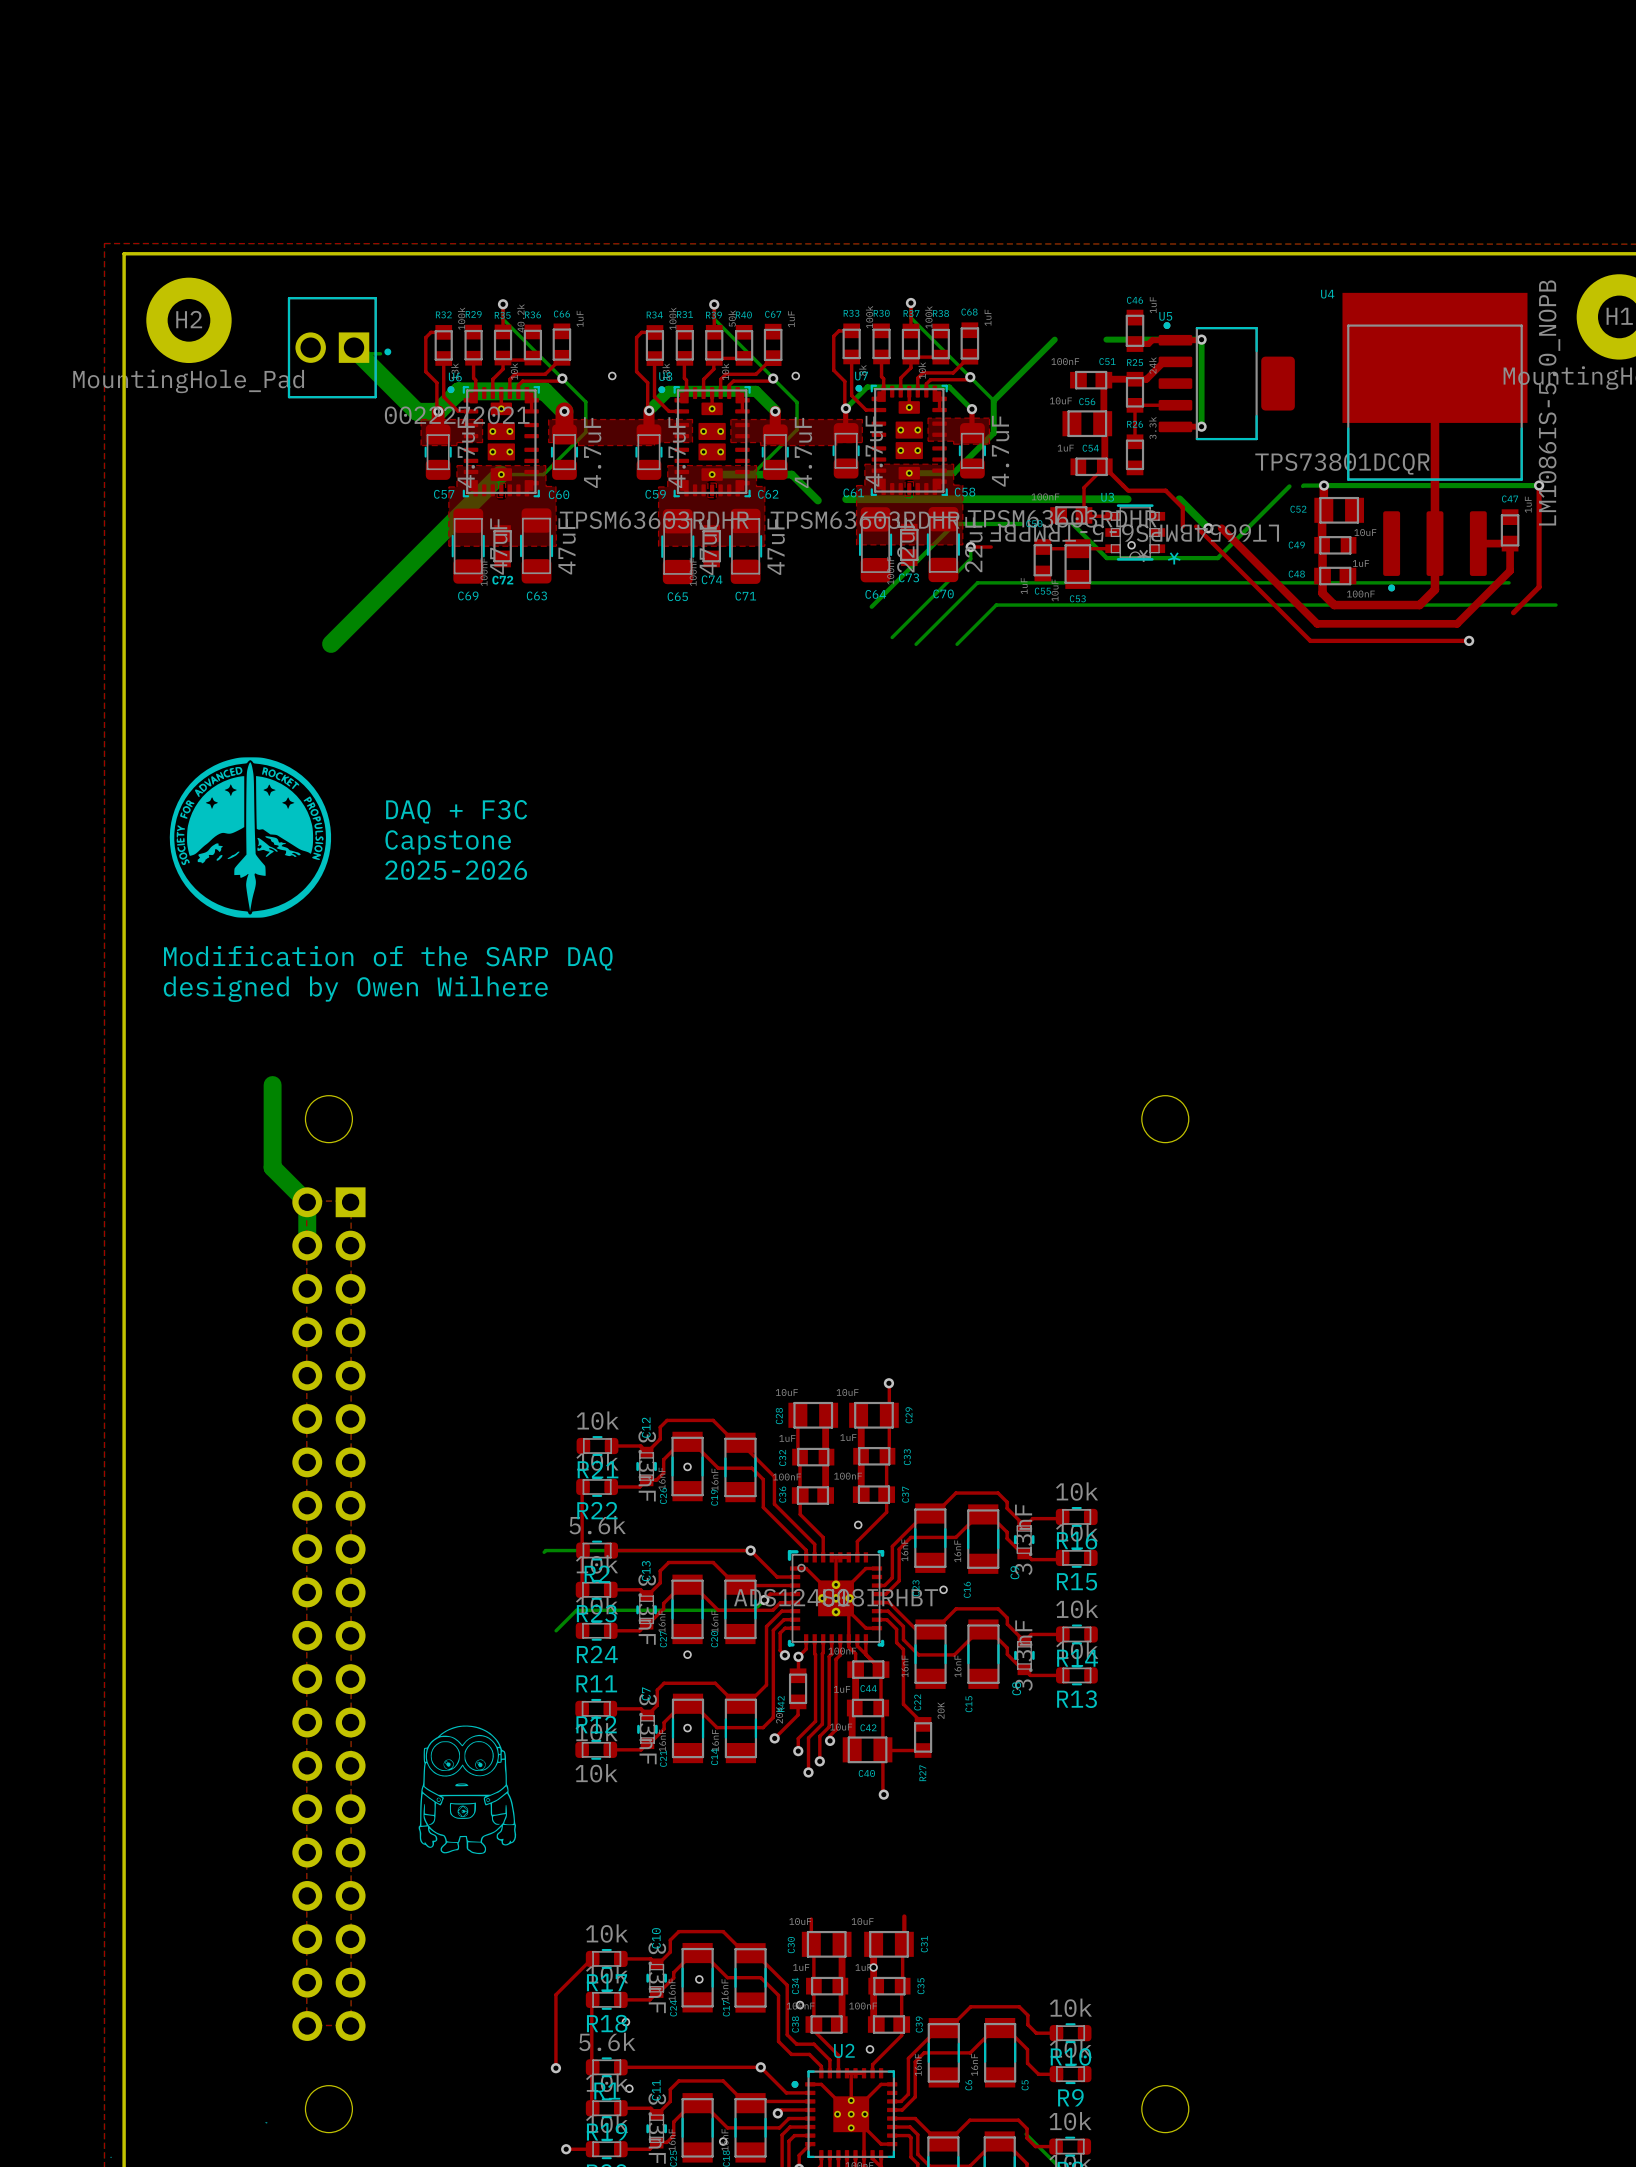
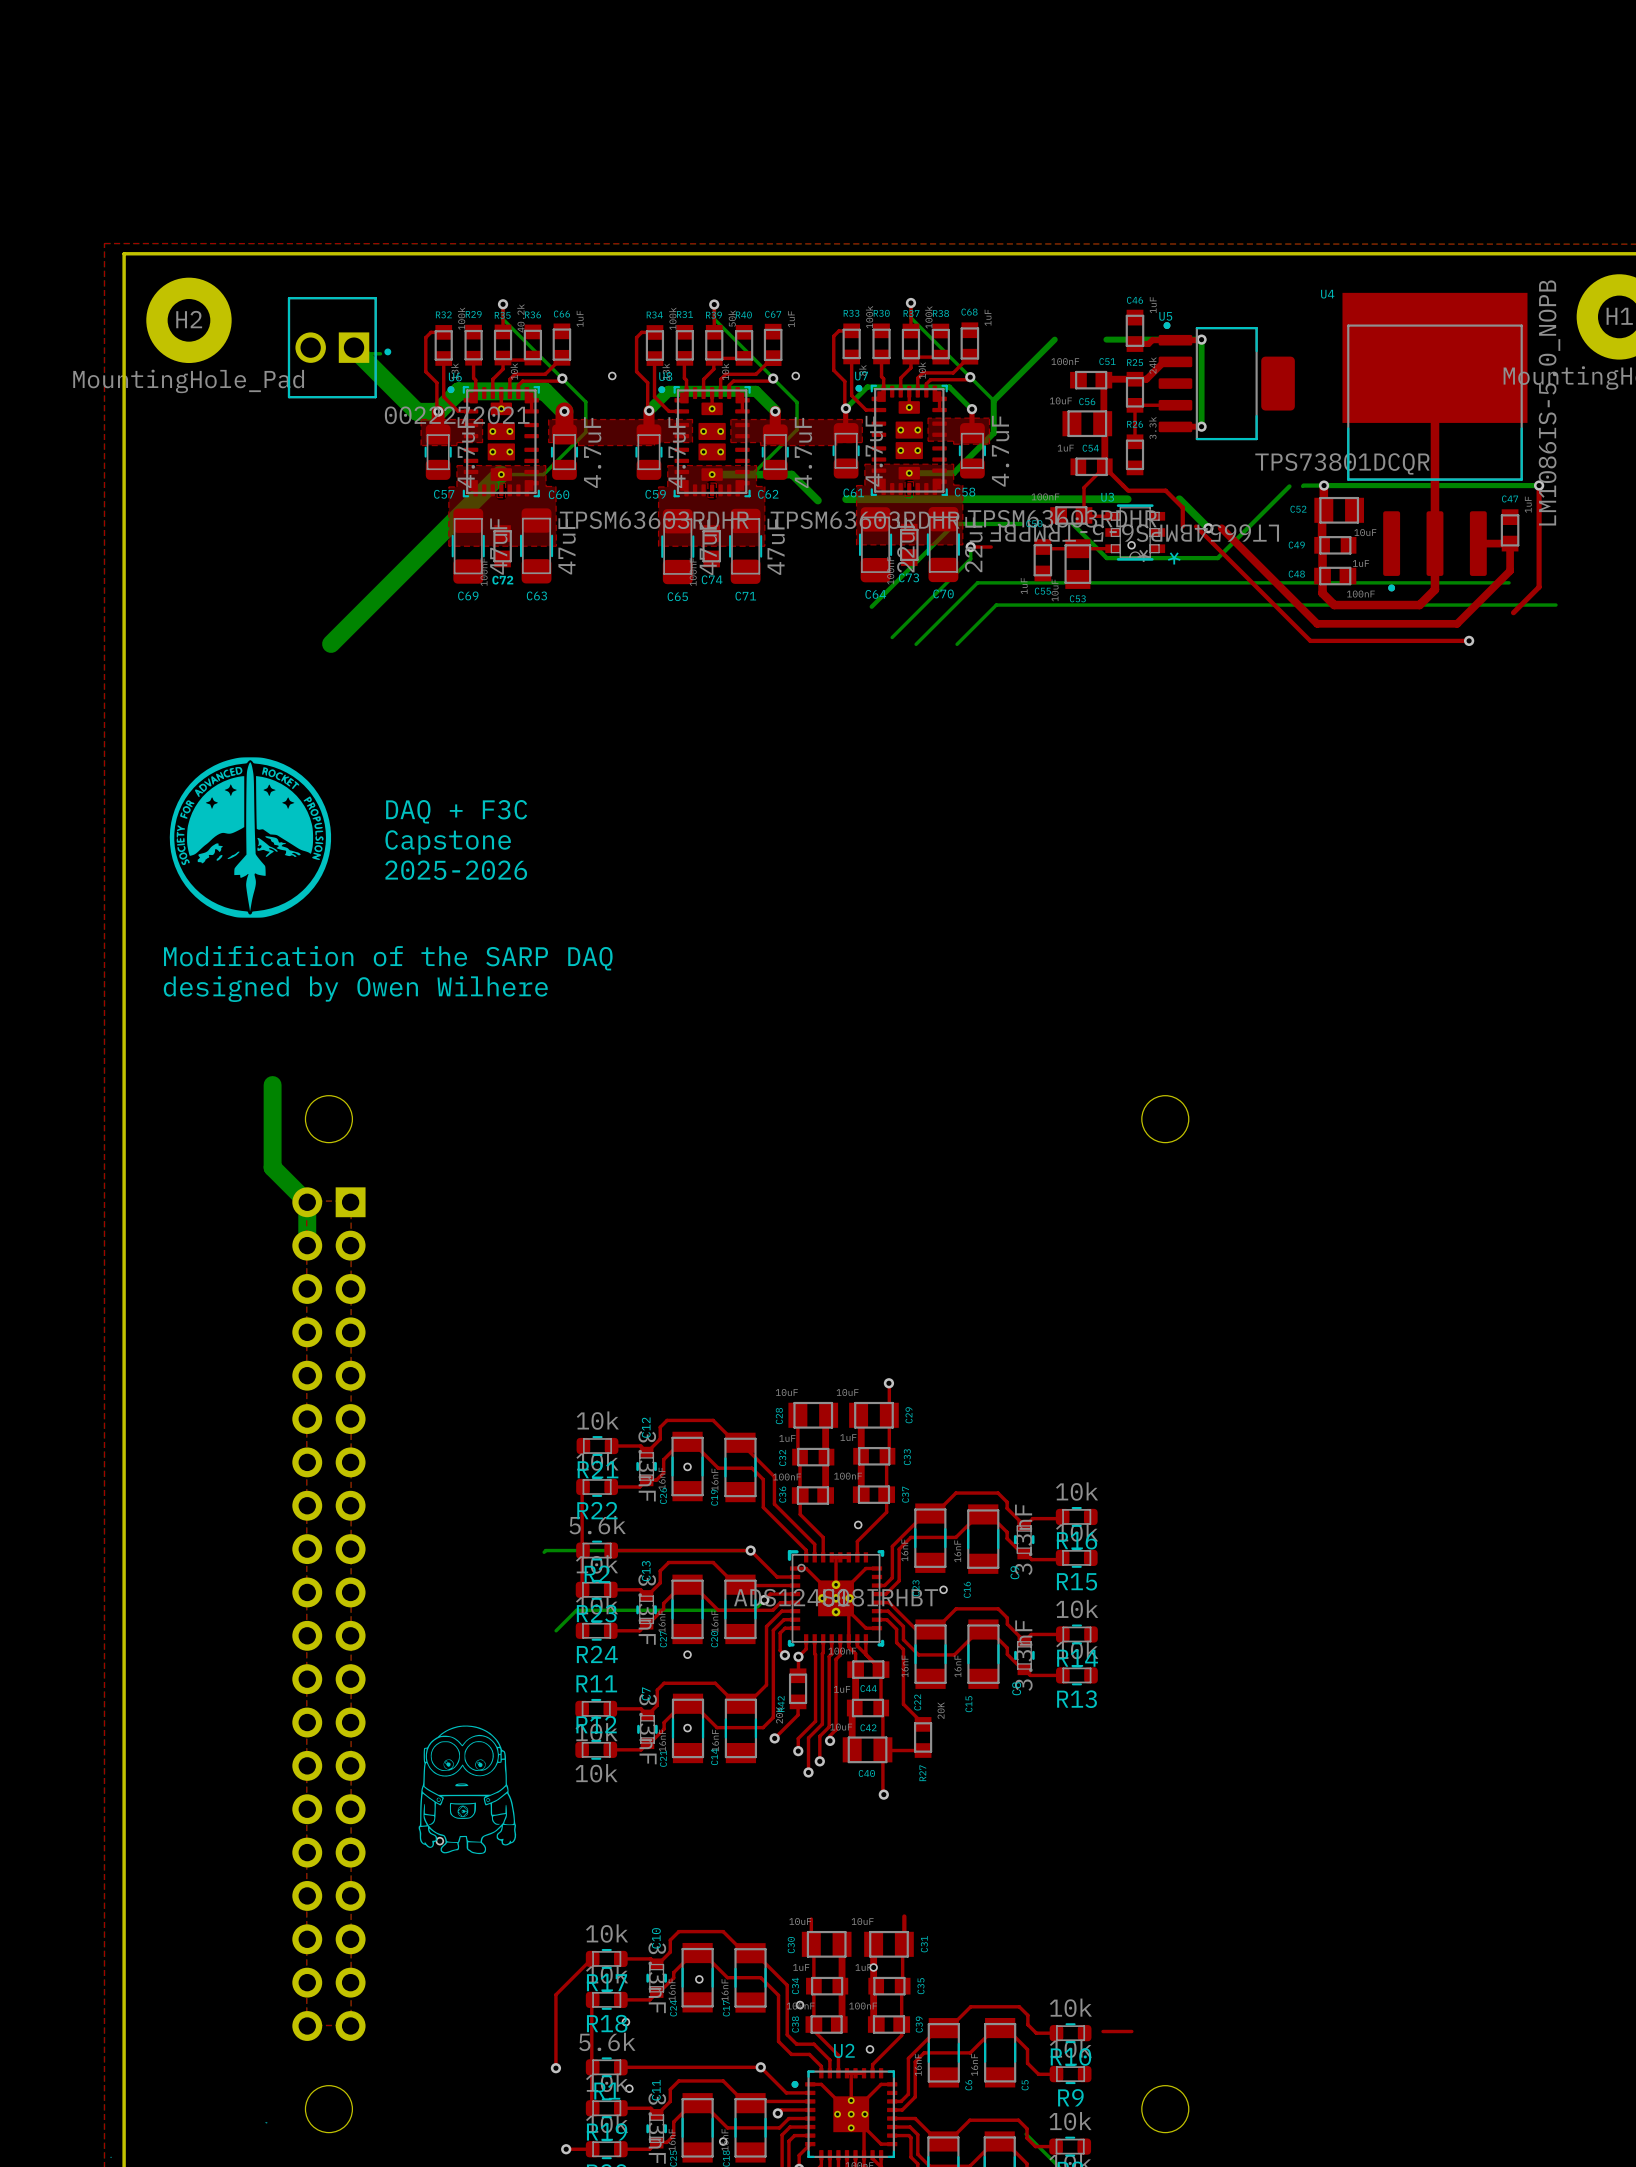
via: none -> (439, 1841)
top track: none -> (1103, 2031) (1131, 2031)

